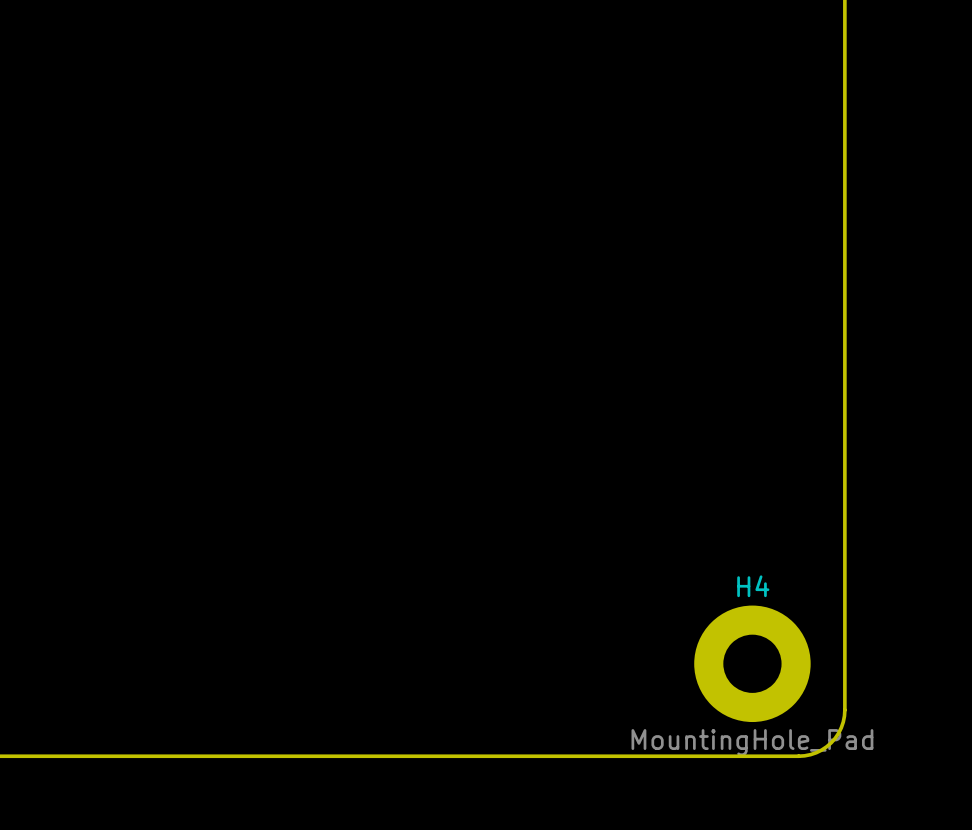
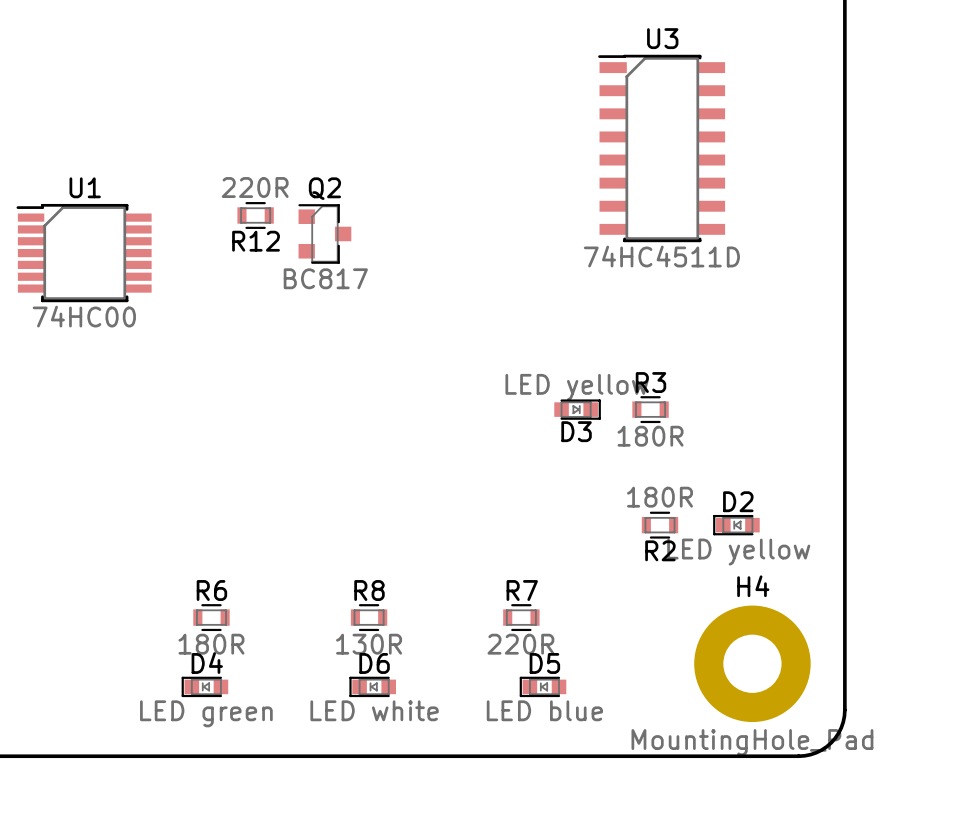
U3: none -> 74HC4511D (661, 148)
R12: none -> 220R (255, 215)
Q2: none -> BC817 (324, 233)
U1: none -> 74HC00 (84, 253)
D3: none -> LED yellow (577, 409)
R3: none -> 180R (650, 409)
R2: none -> 180R (660, 525)
D2: none -> LED yellow (736, 525)
R6: none -> 180R (211, 617)
R8: none -> 130R (369, 617)
R7: none -> 220R (521, 617)
D4: none -> LED green (204, 686)
D6: none -> LED white (372, 686)
D5: none -> LED blue (543, 686)

